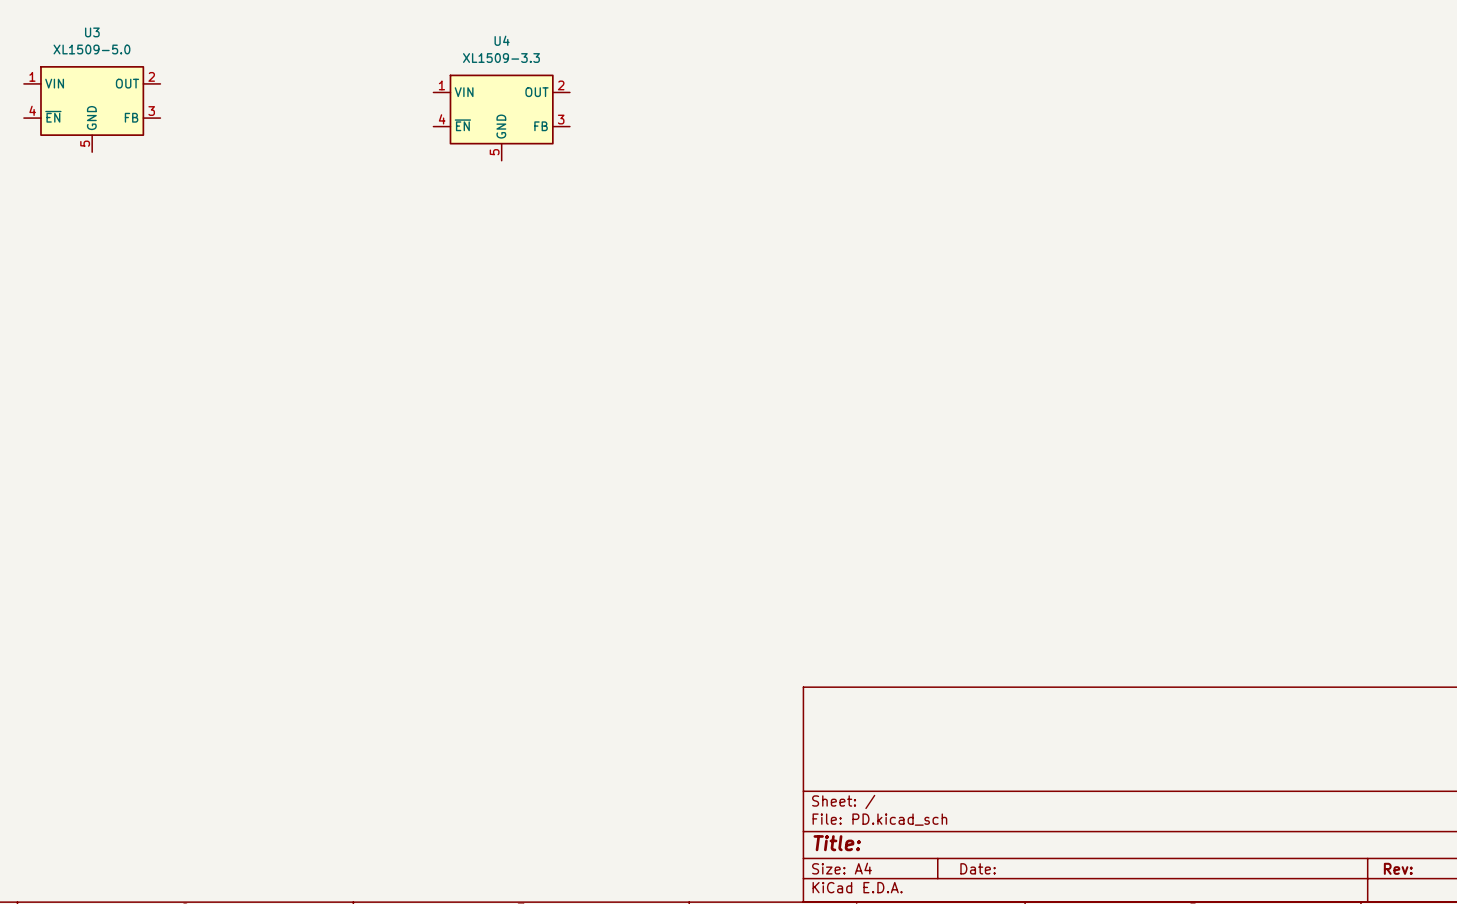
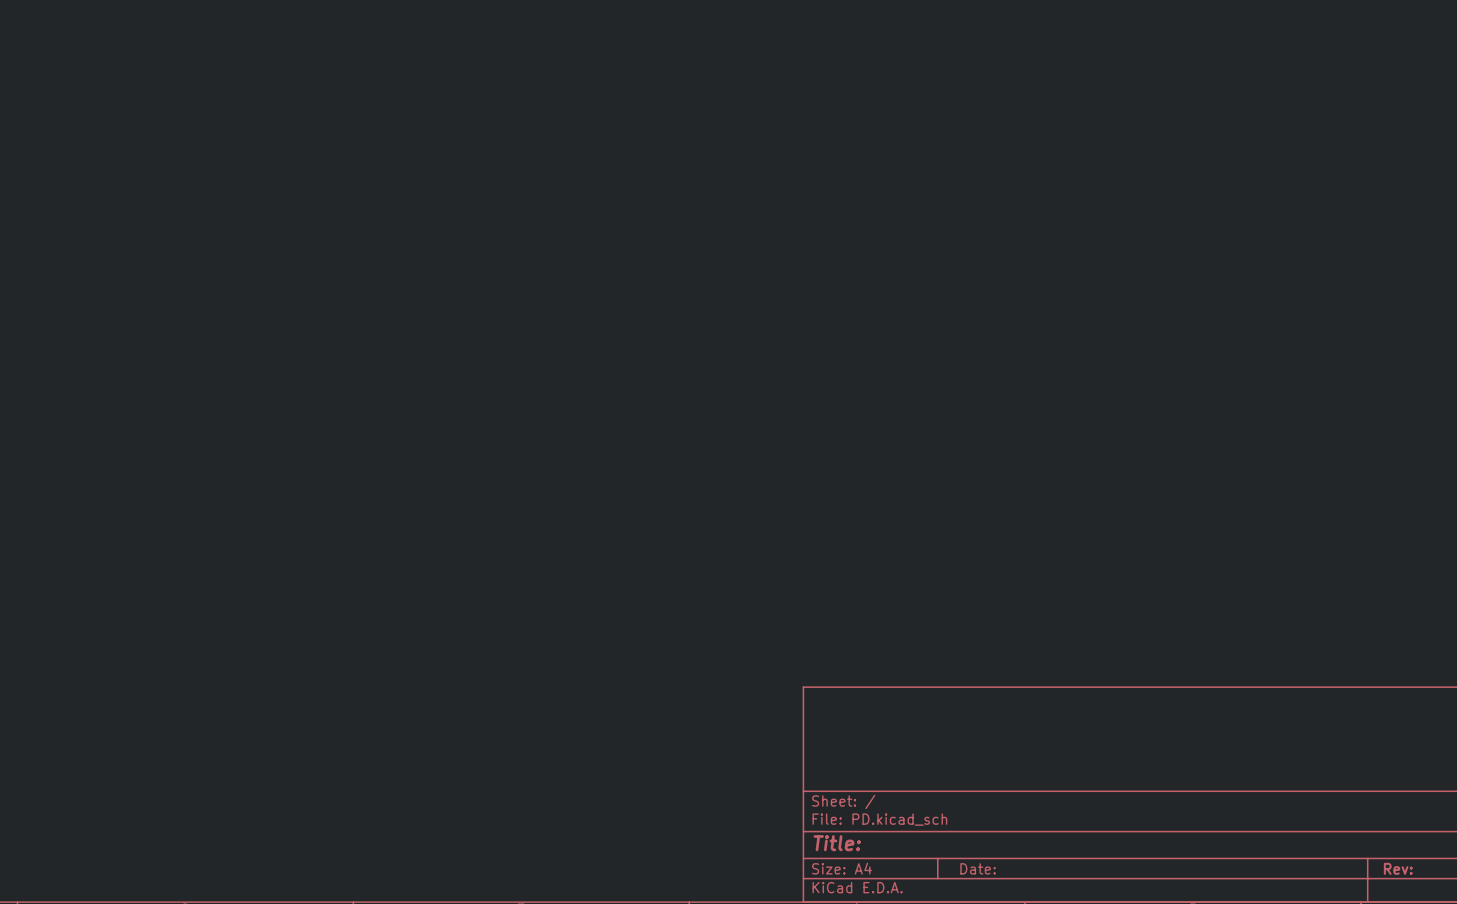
U3: XL1509-5.0 (92, 109) -> none
U4: XL1509-3.3 (501, 117) -> none

